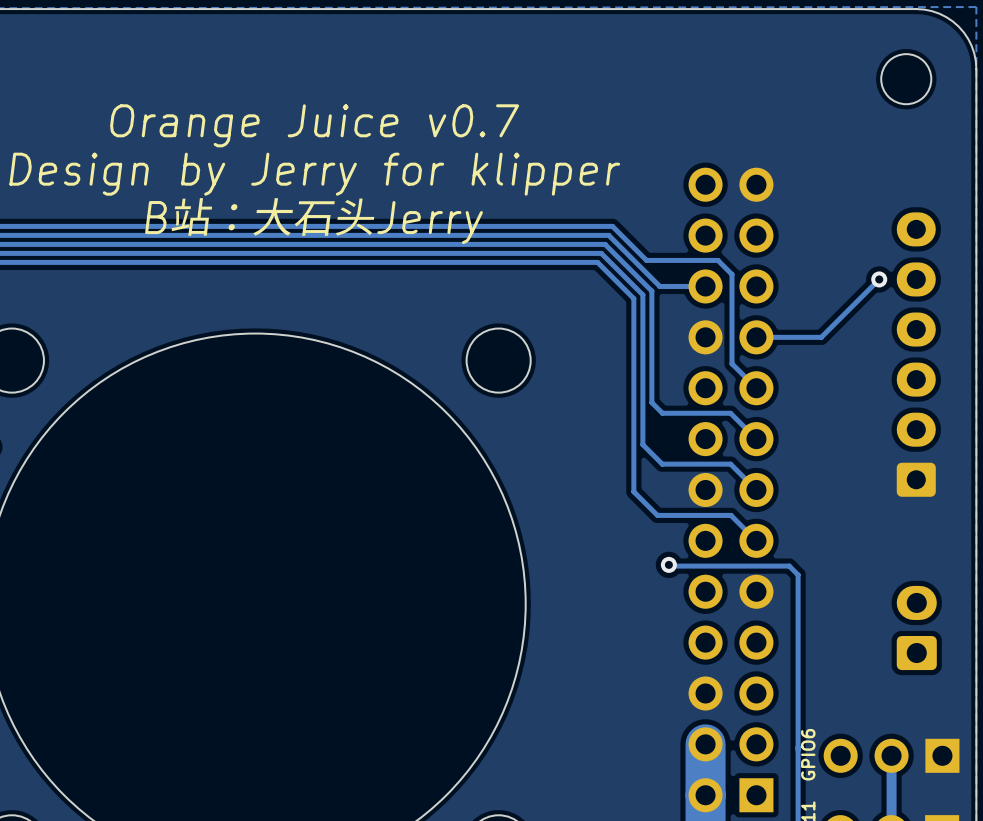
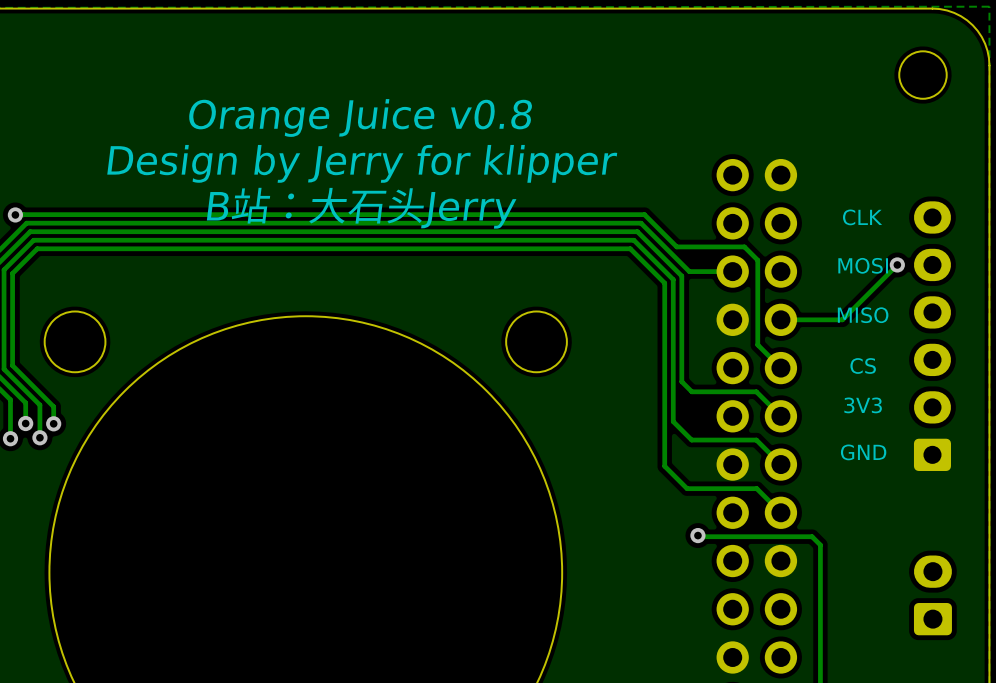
text: Orange Juice v0.7 (314, 125) -> Orange Juice v0.8 (360, 117)
text: none -> CLK (862, 217)
text: none -> MOSI (863, 265)
text: none -> MISO (863, 315)
text: none -> CS (863, 366)
text: none -> 3V3 (863, 405)
text: none -> GND (863, 452)

